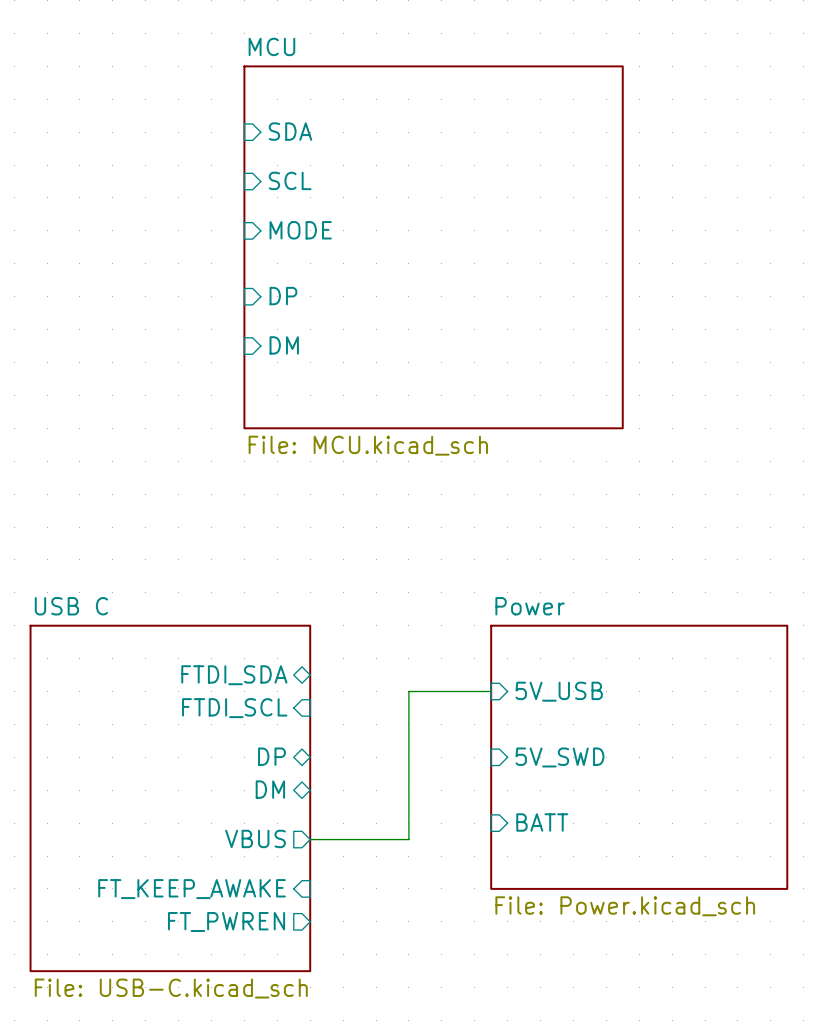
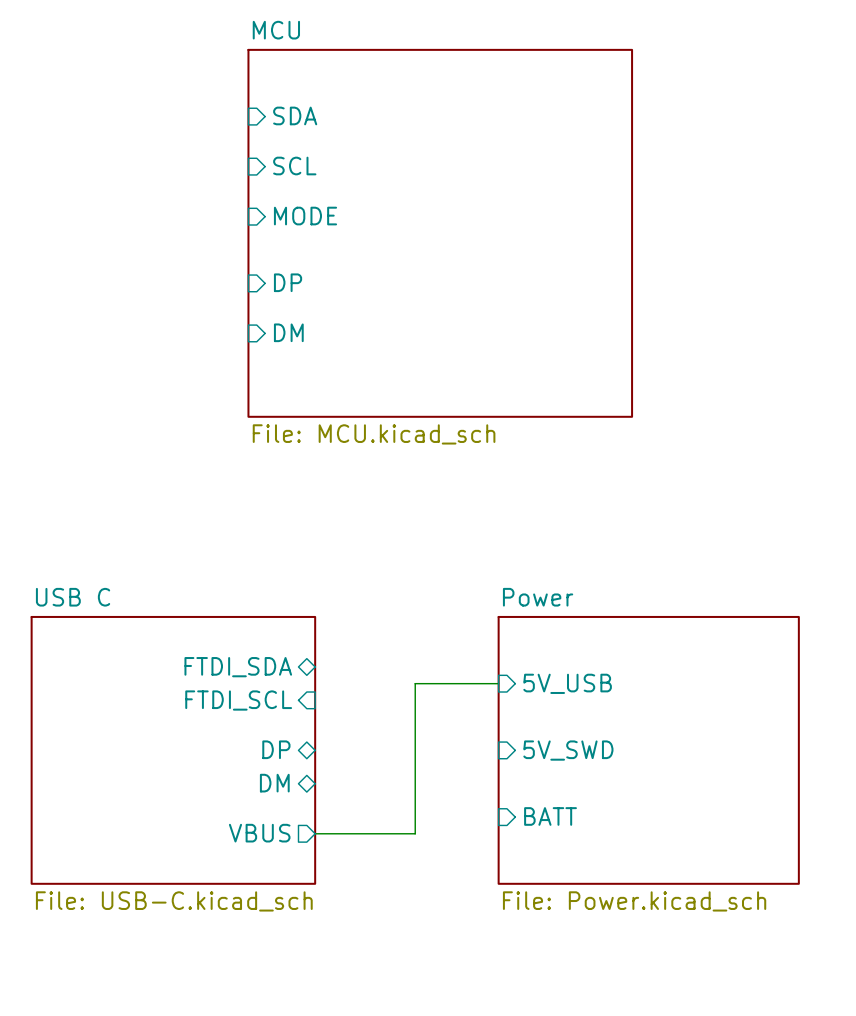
sheet USB C: none -> File: USB-C.kicad_sch (173, 750)
sheet USB C: File: USB-C.kicad_sch (170, 798) -> none
sheet pin: FT_KEEP_AWAKE (192, 889) -> none
sheet pin: FT_PWREN (226, 921) -> none

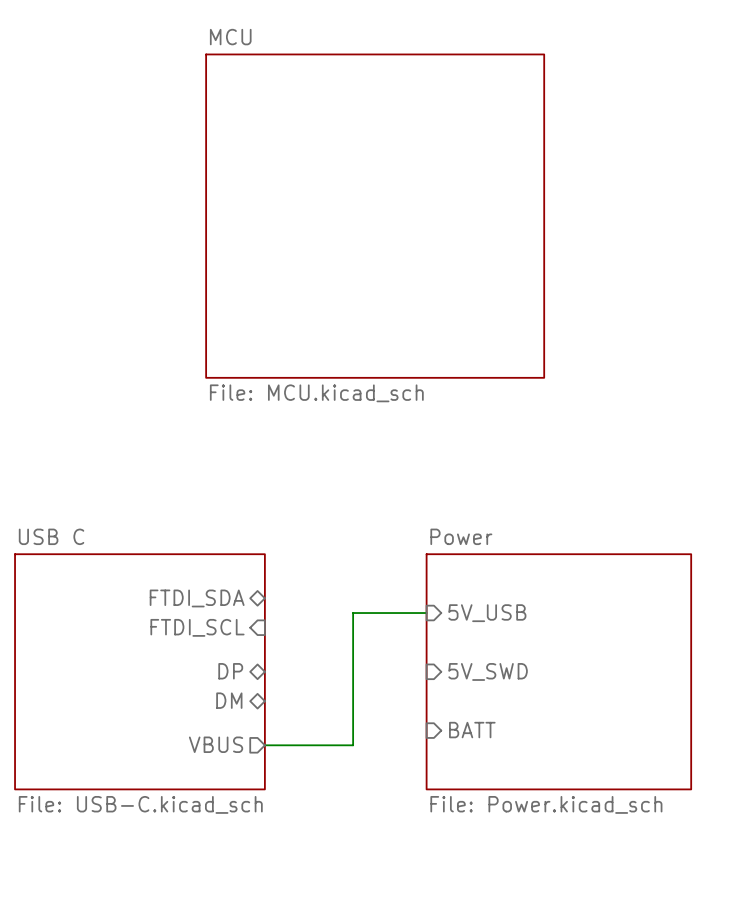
sheet pin: SDA (295, 115) -> none
sheet pin: SCL (294, 166) -> none
sheet pin: MODE (305, 216) -> none
sheet pin: DP (288, 282) -> none
sheet pin: DM (288, 332) -> none

